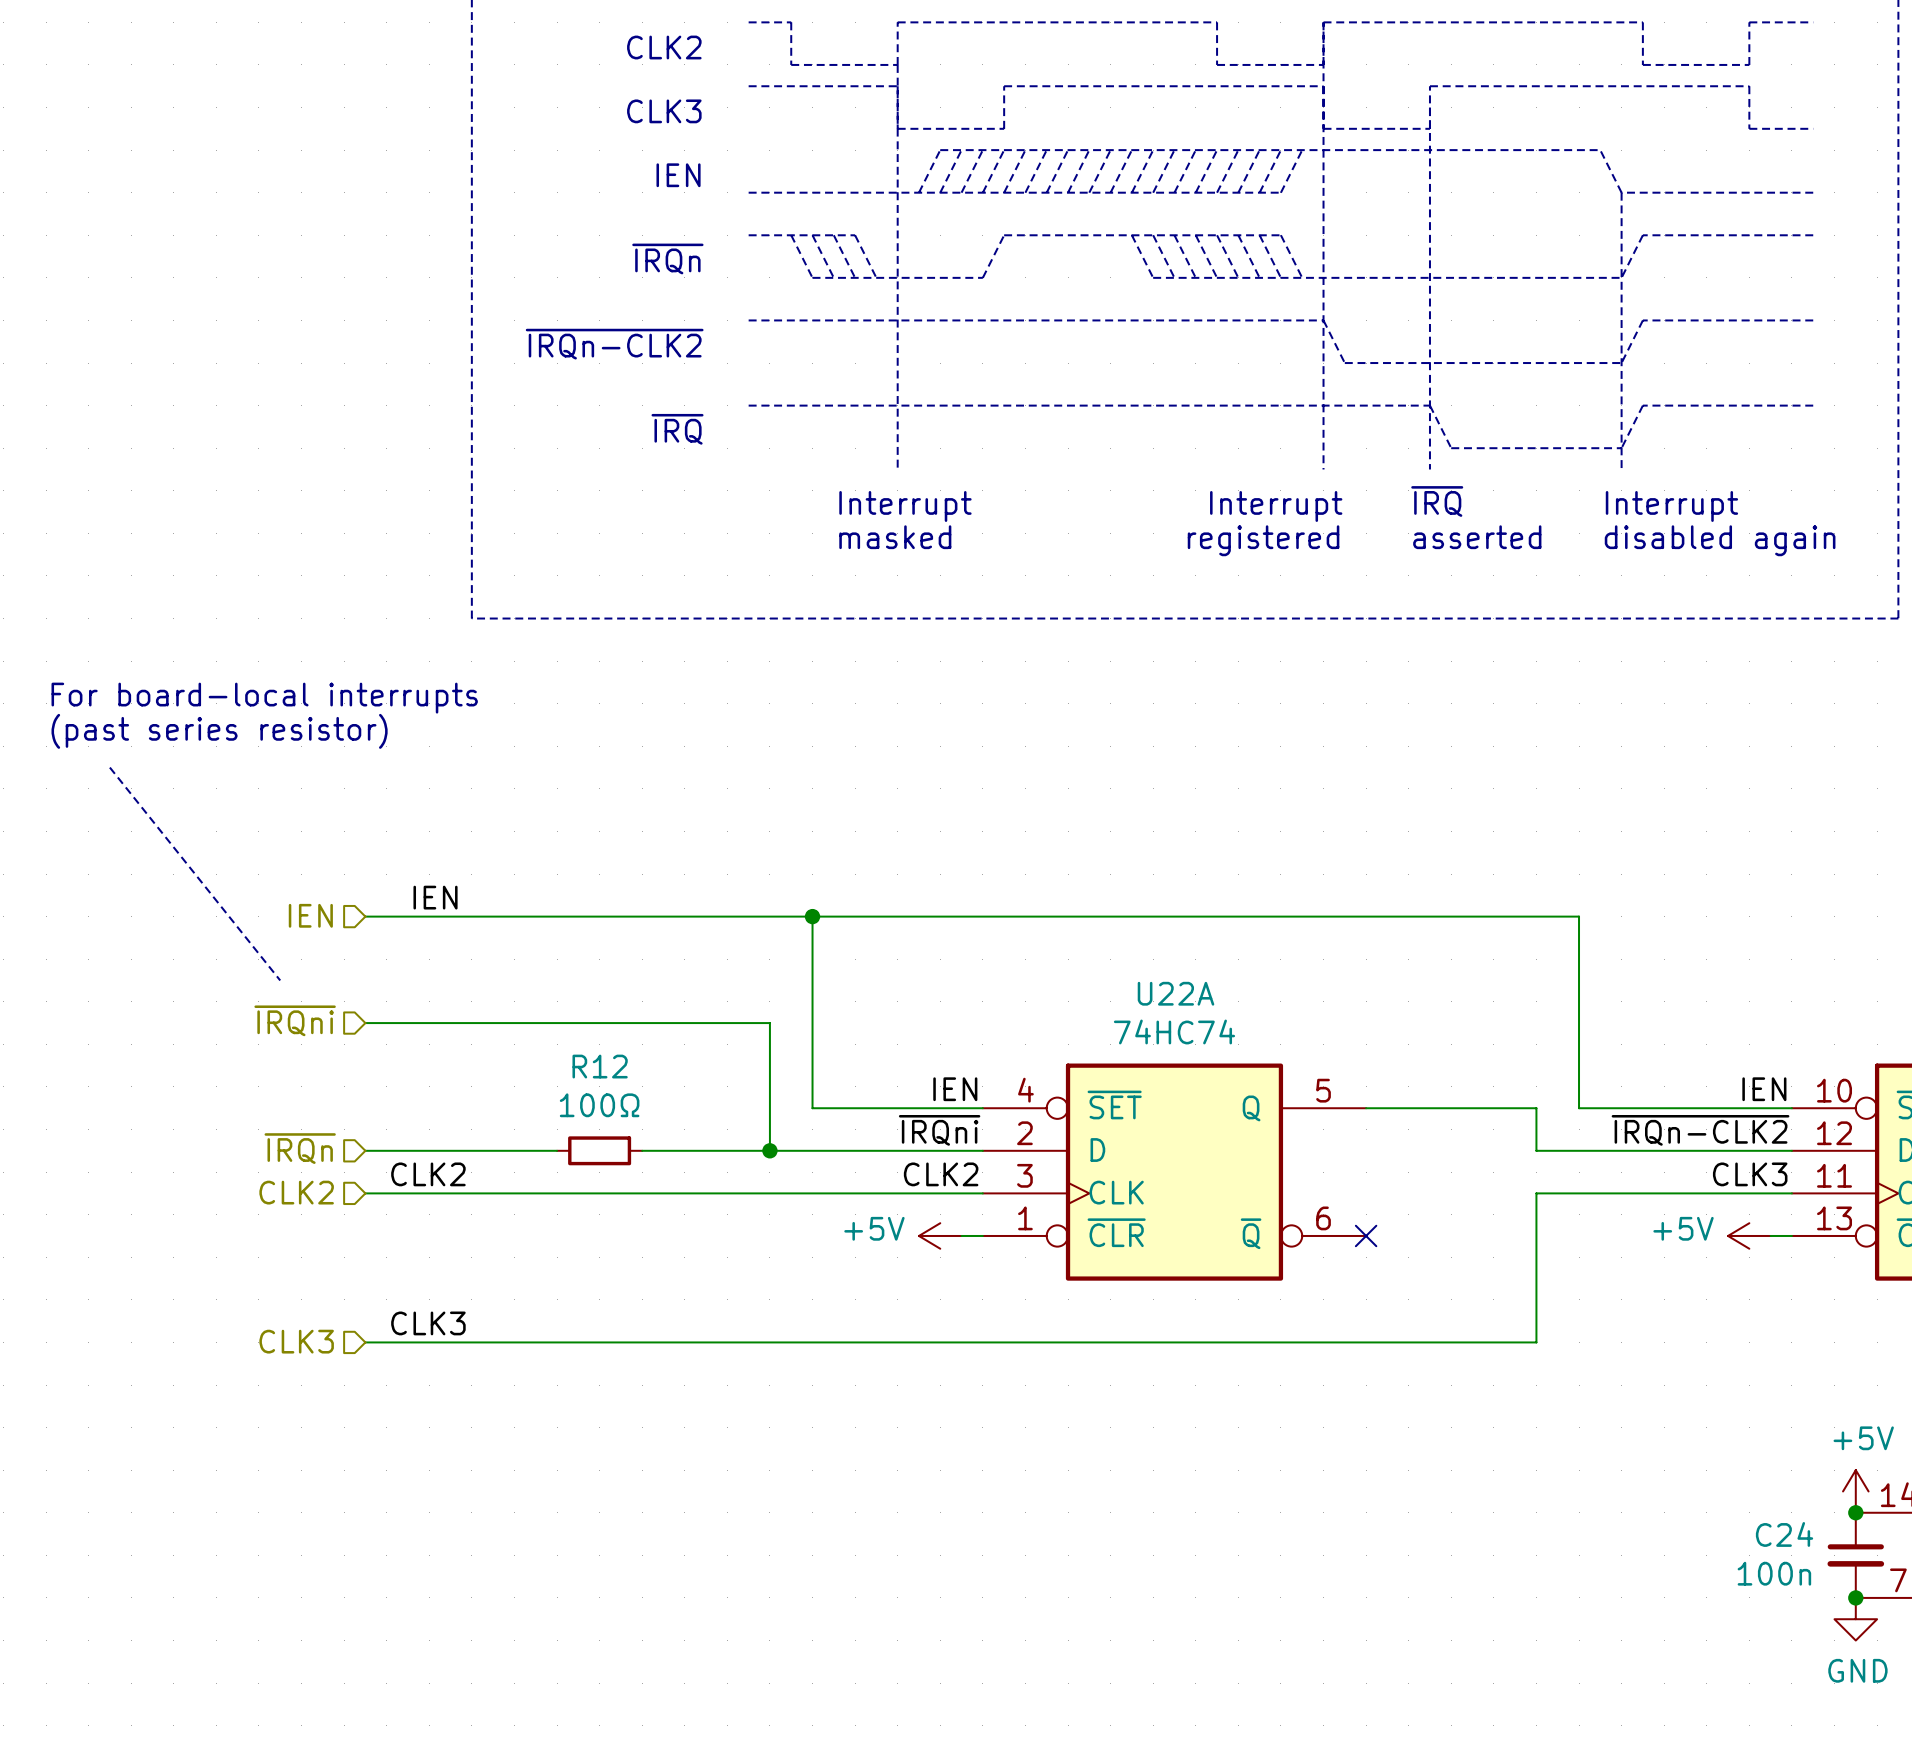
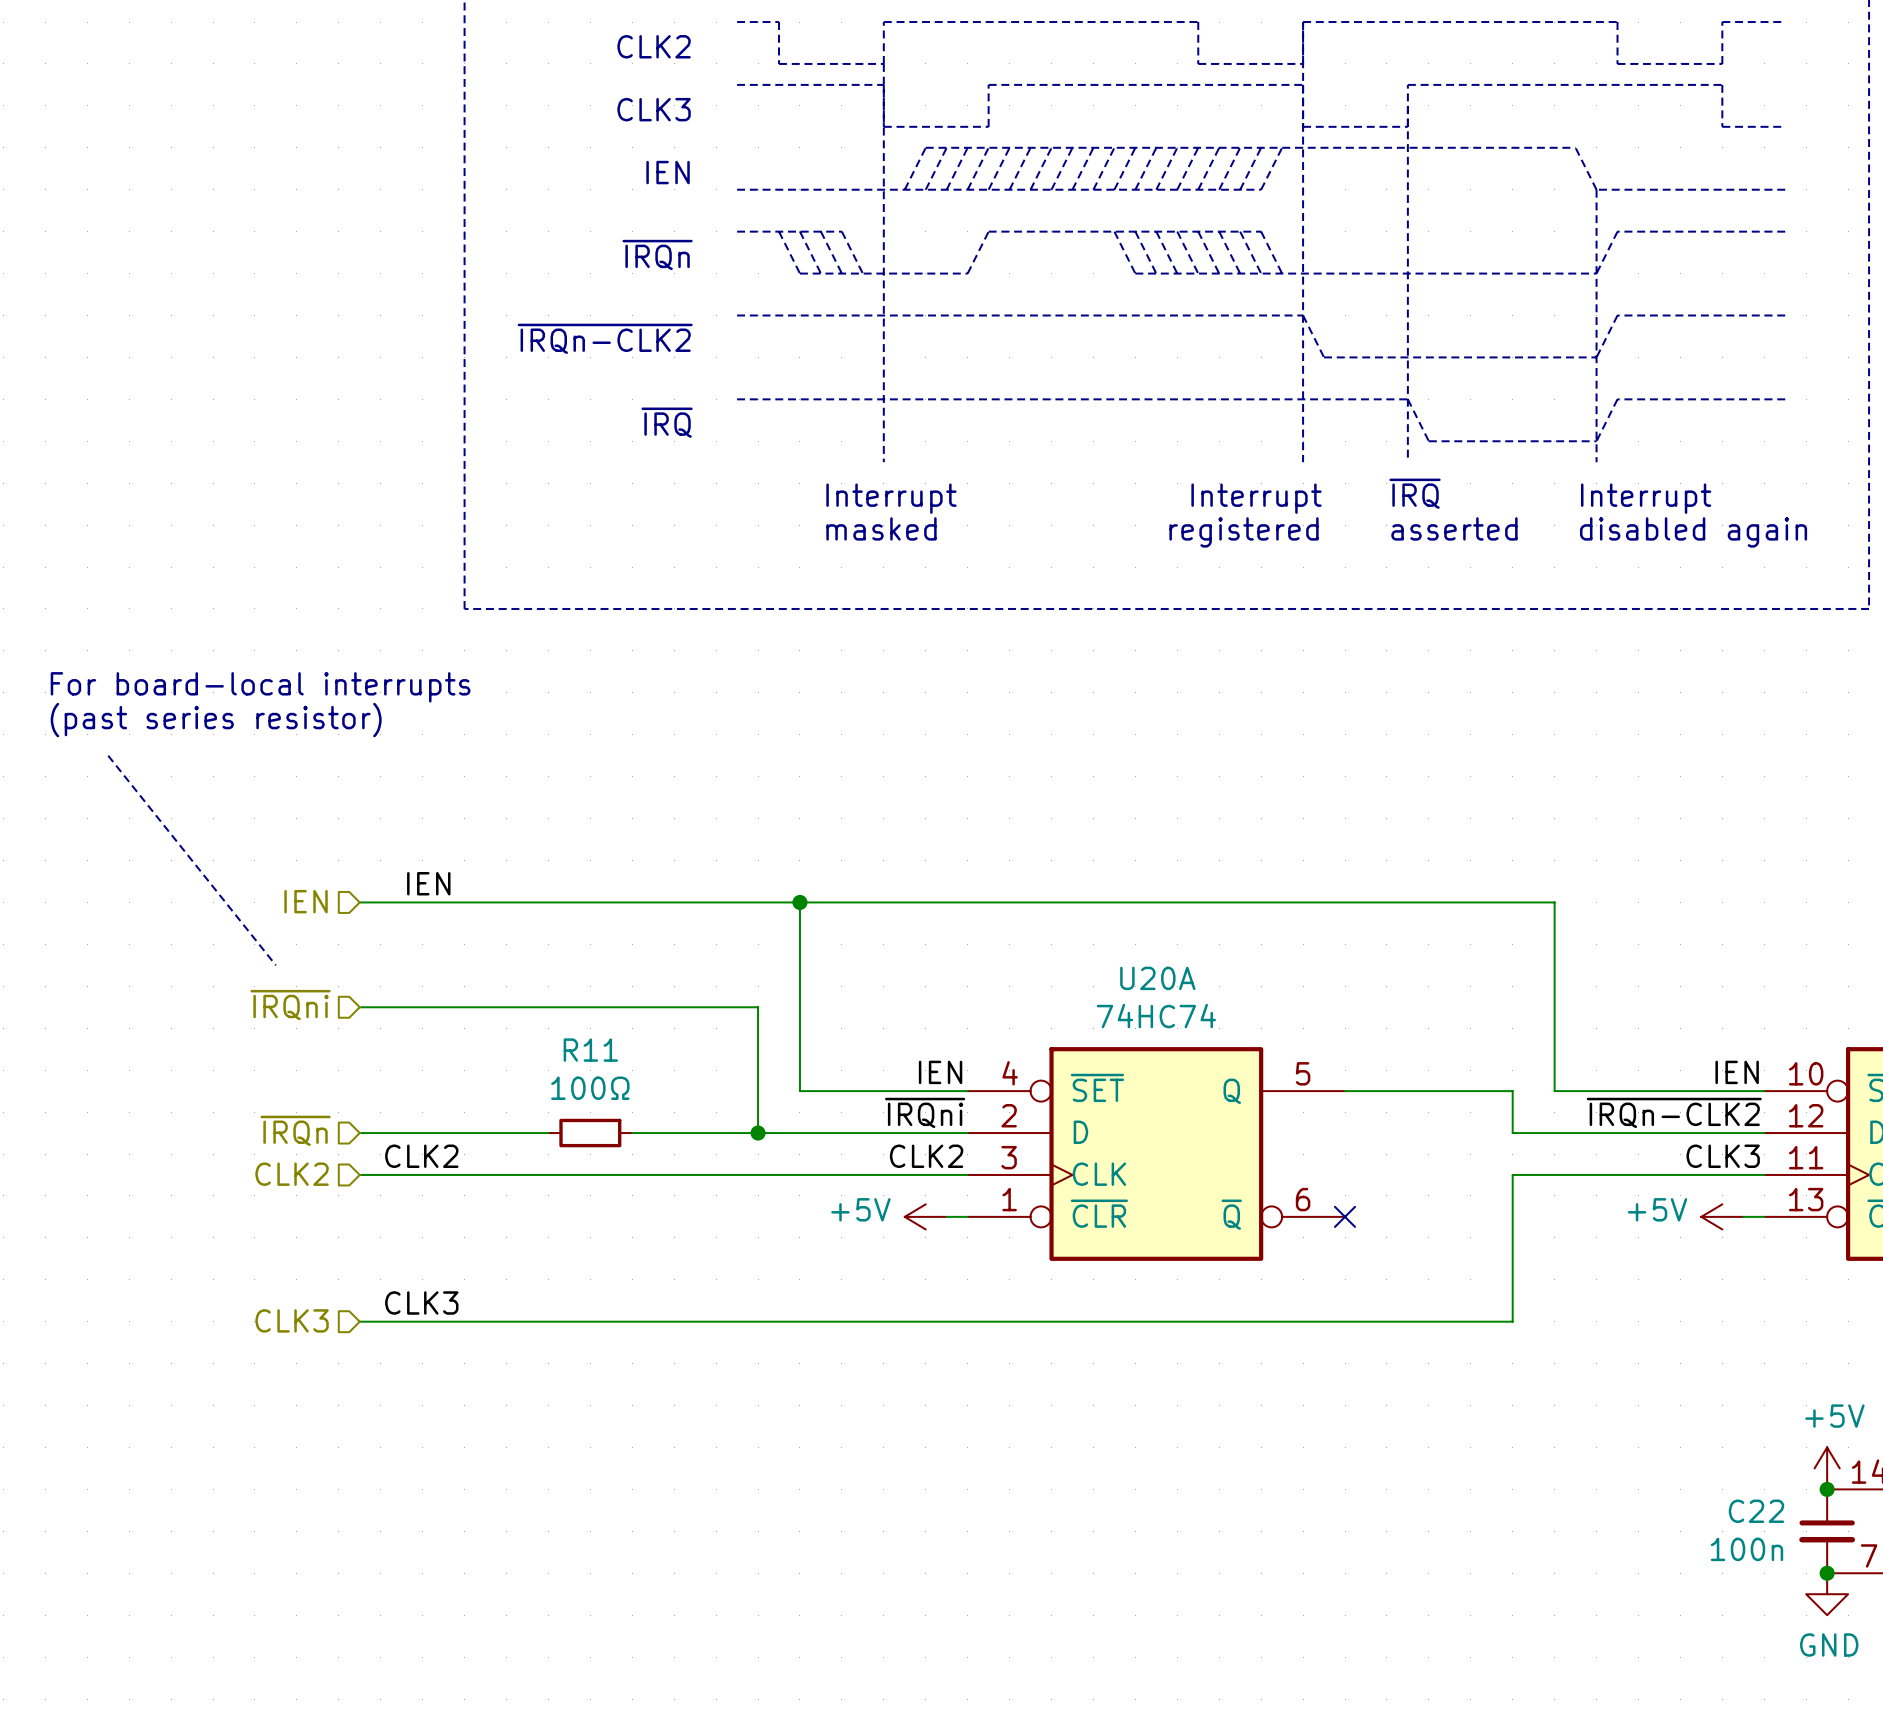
U22A name: U22A (1176, 993) -> U20A (1157, 978)
R12 name: R12 (600, 1066) -> R11 (590, 1050)
C24 name: C24 (1784, 1534) -> C22 (1756, 1511)

